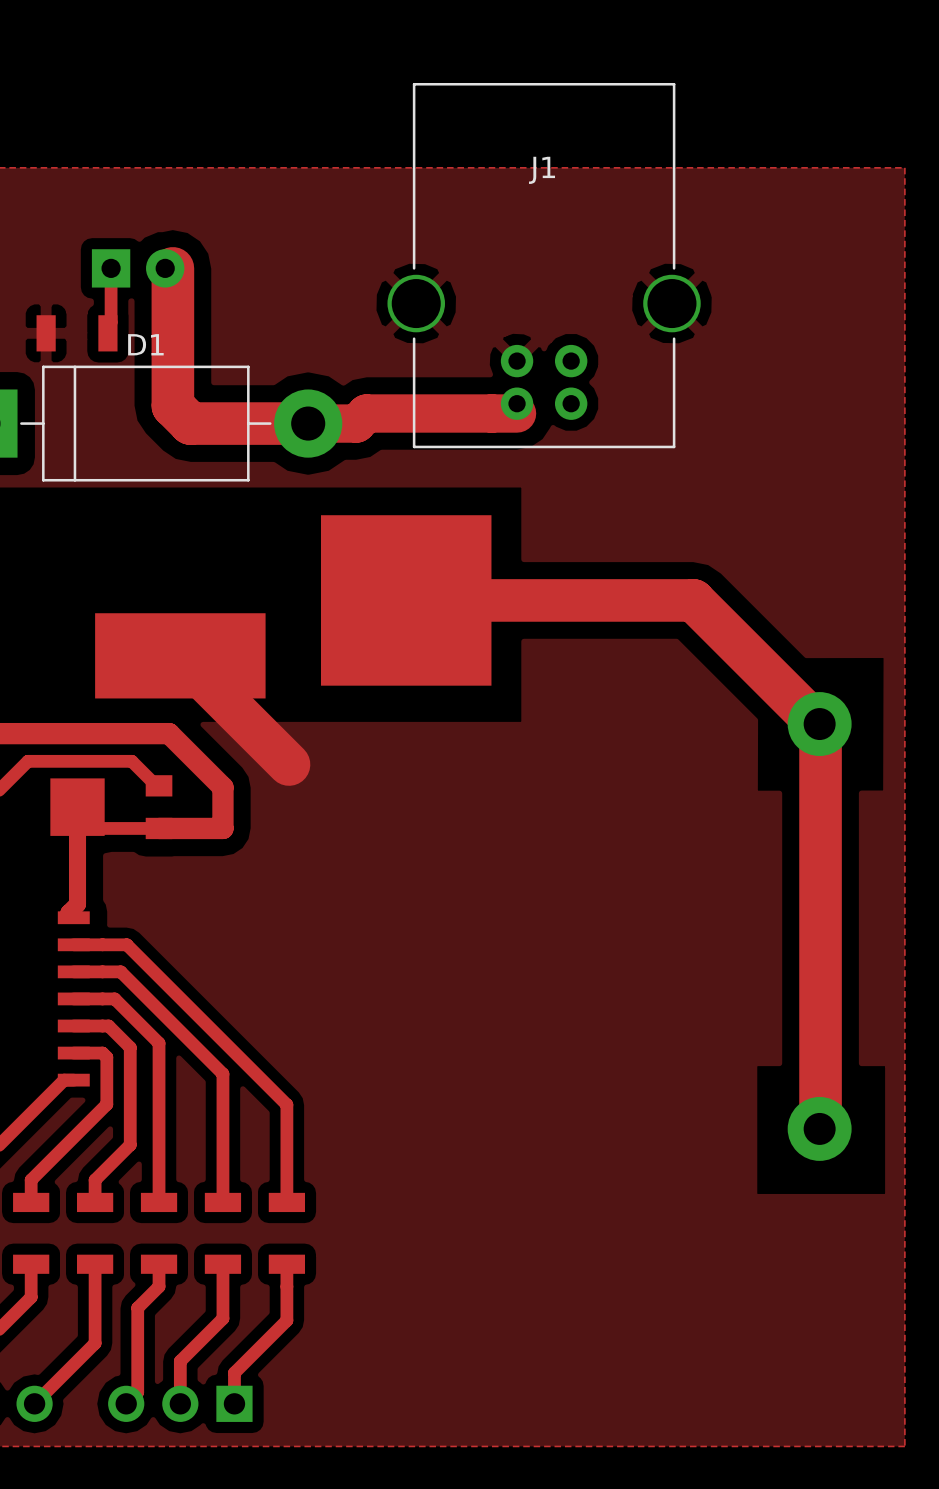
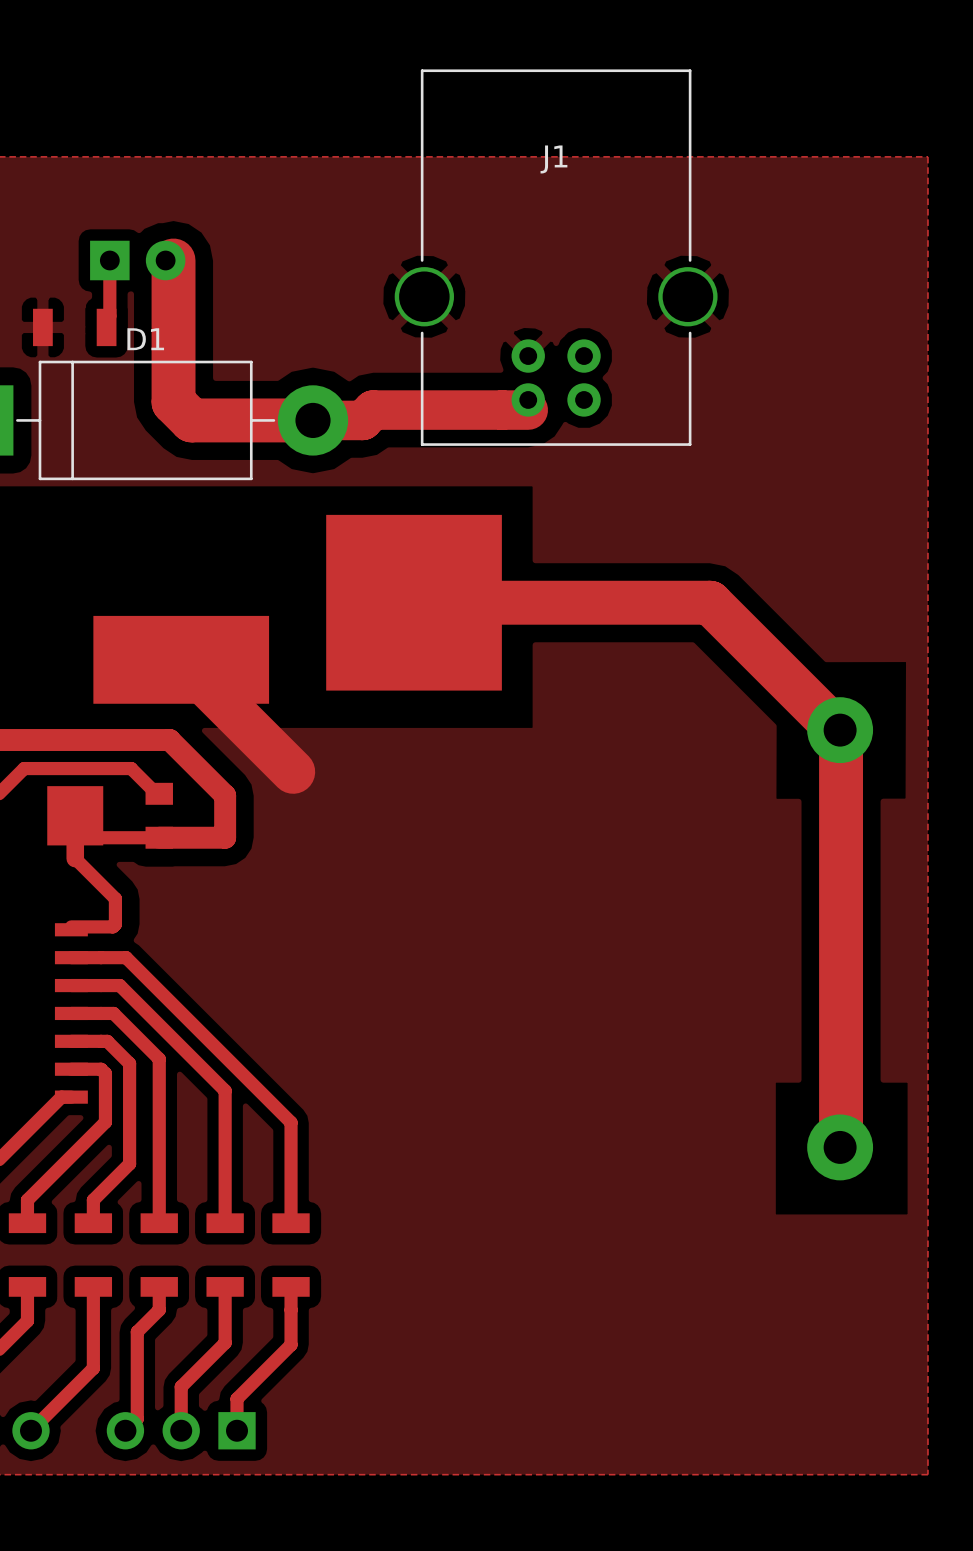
top track: (77, 848) (77, 904) (68, 912) (73, 912) -> (75, 858) (115, 898) (115, 924) (112, 926) (71, 926)

